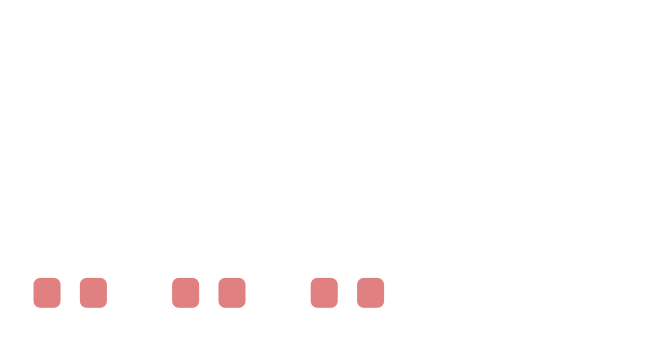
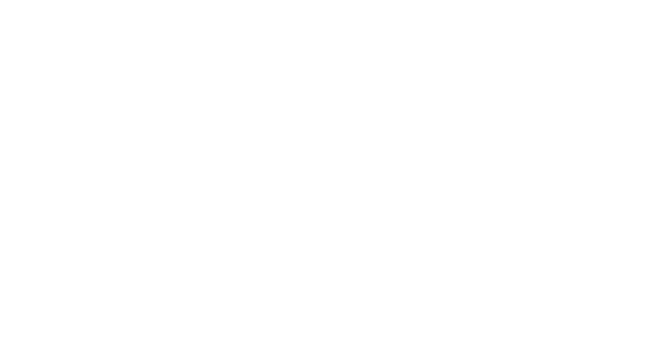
part: (70, 292) -> none
part: (208, 292) -> none
part: (347, 292) -> none

